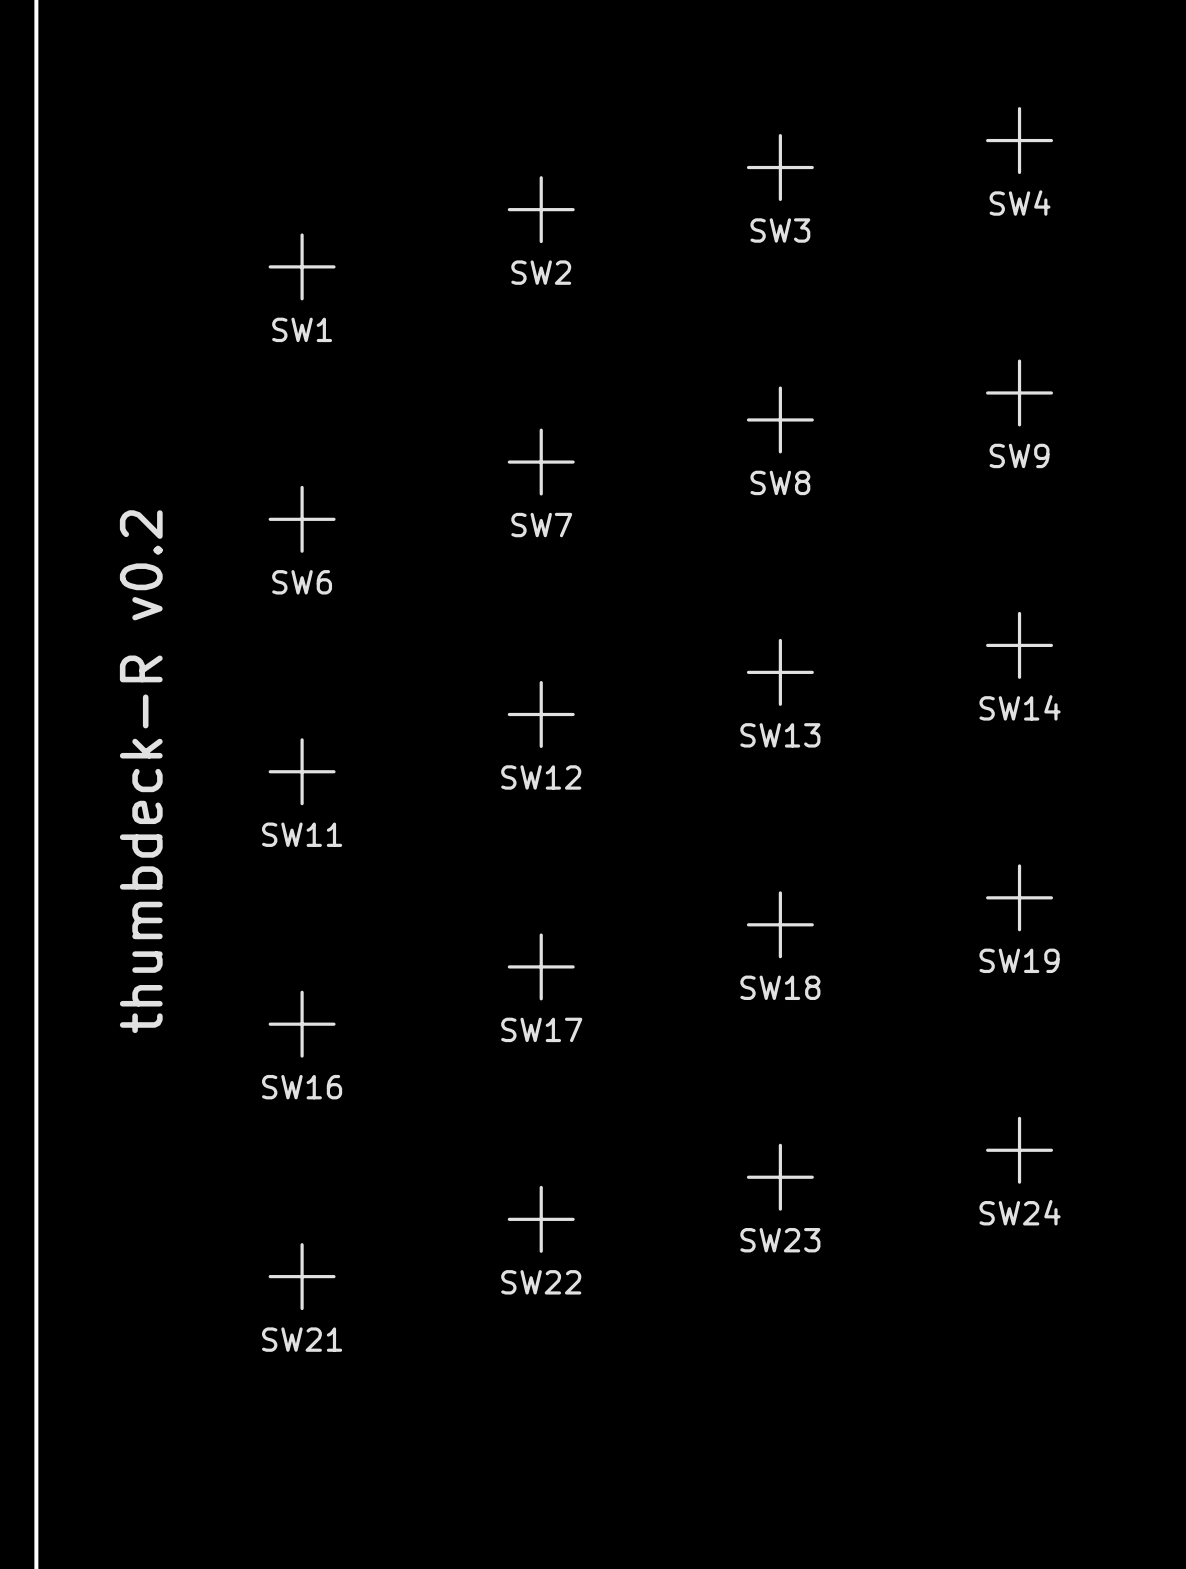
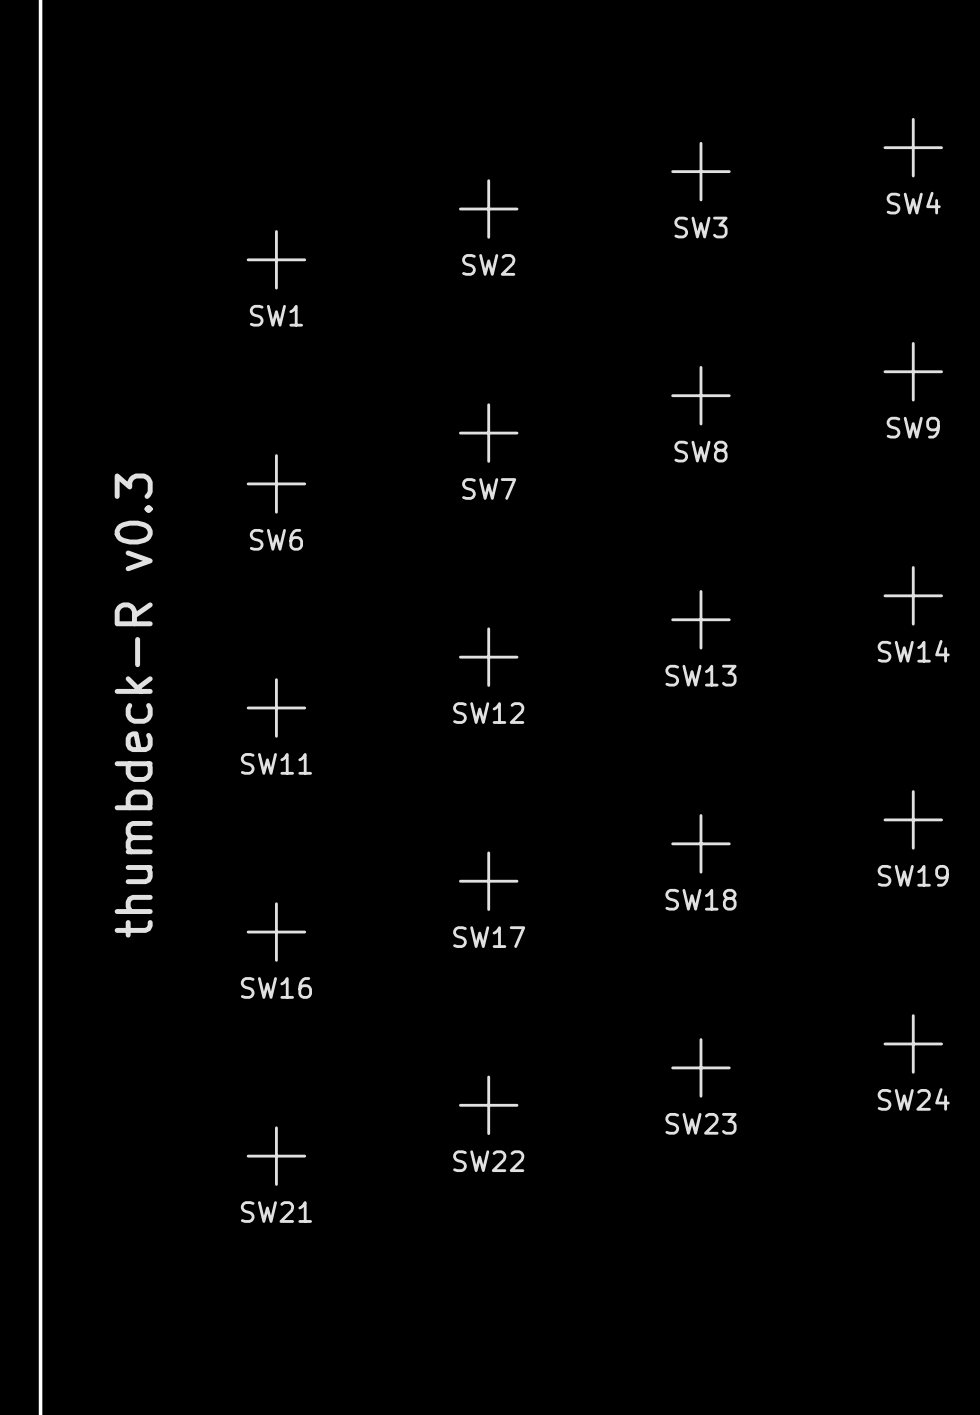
text: thumbdeck-R v0.2 (141, 771) -> thumbdeck-R v0.3 (133, 705)

